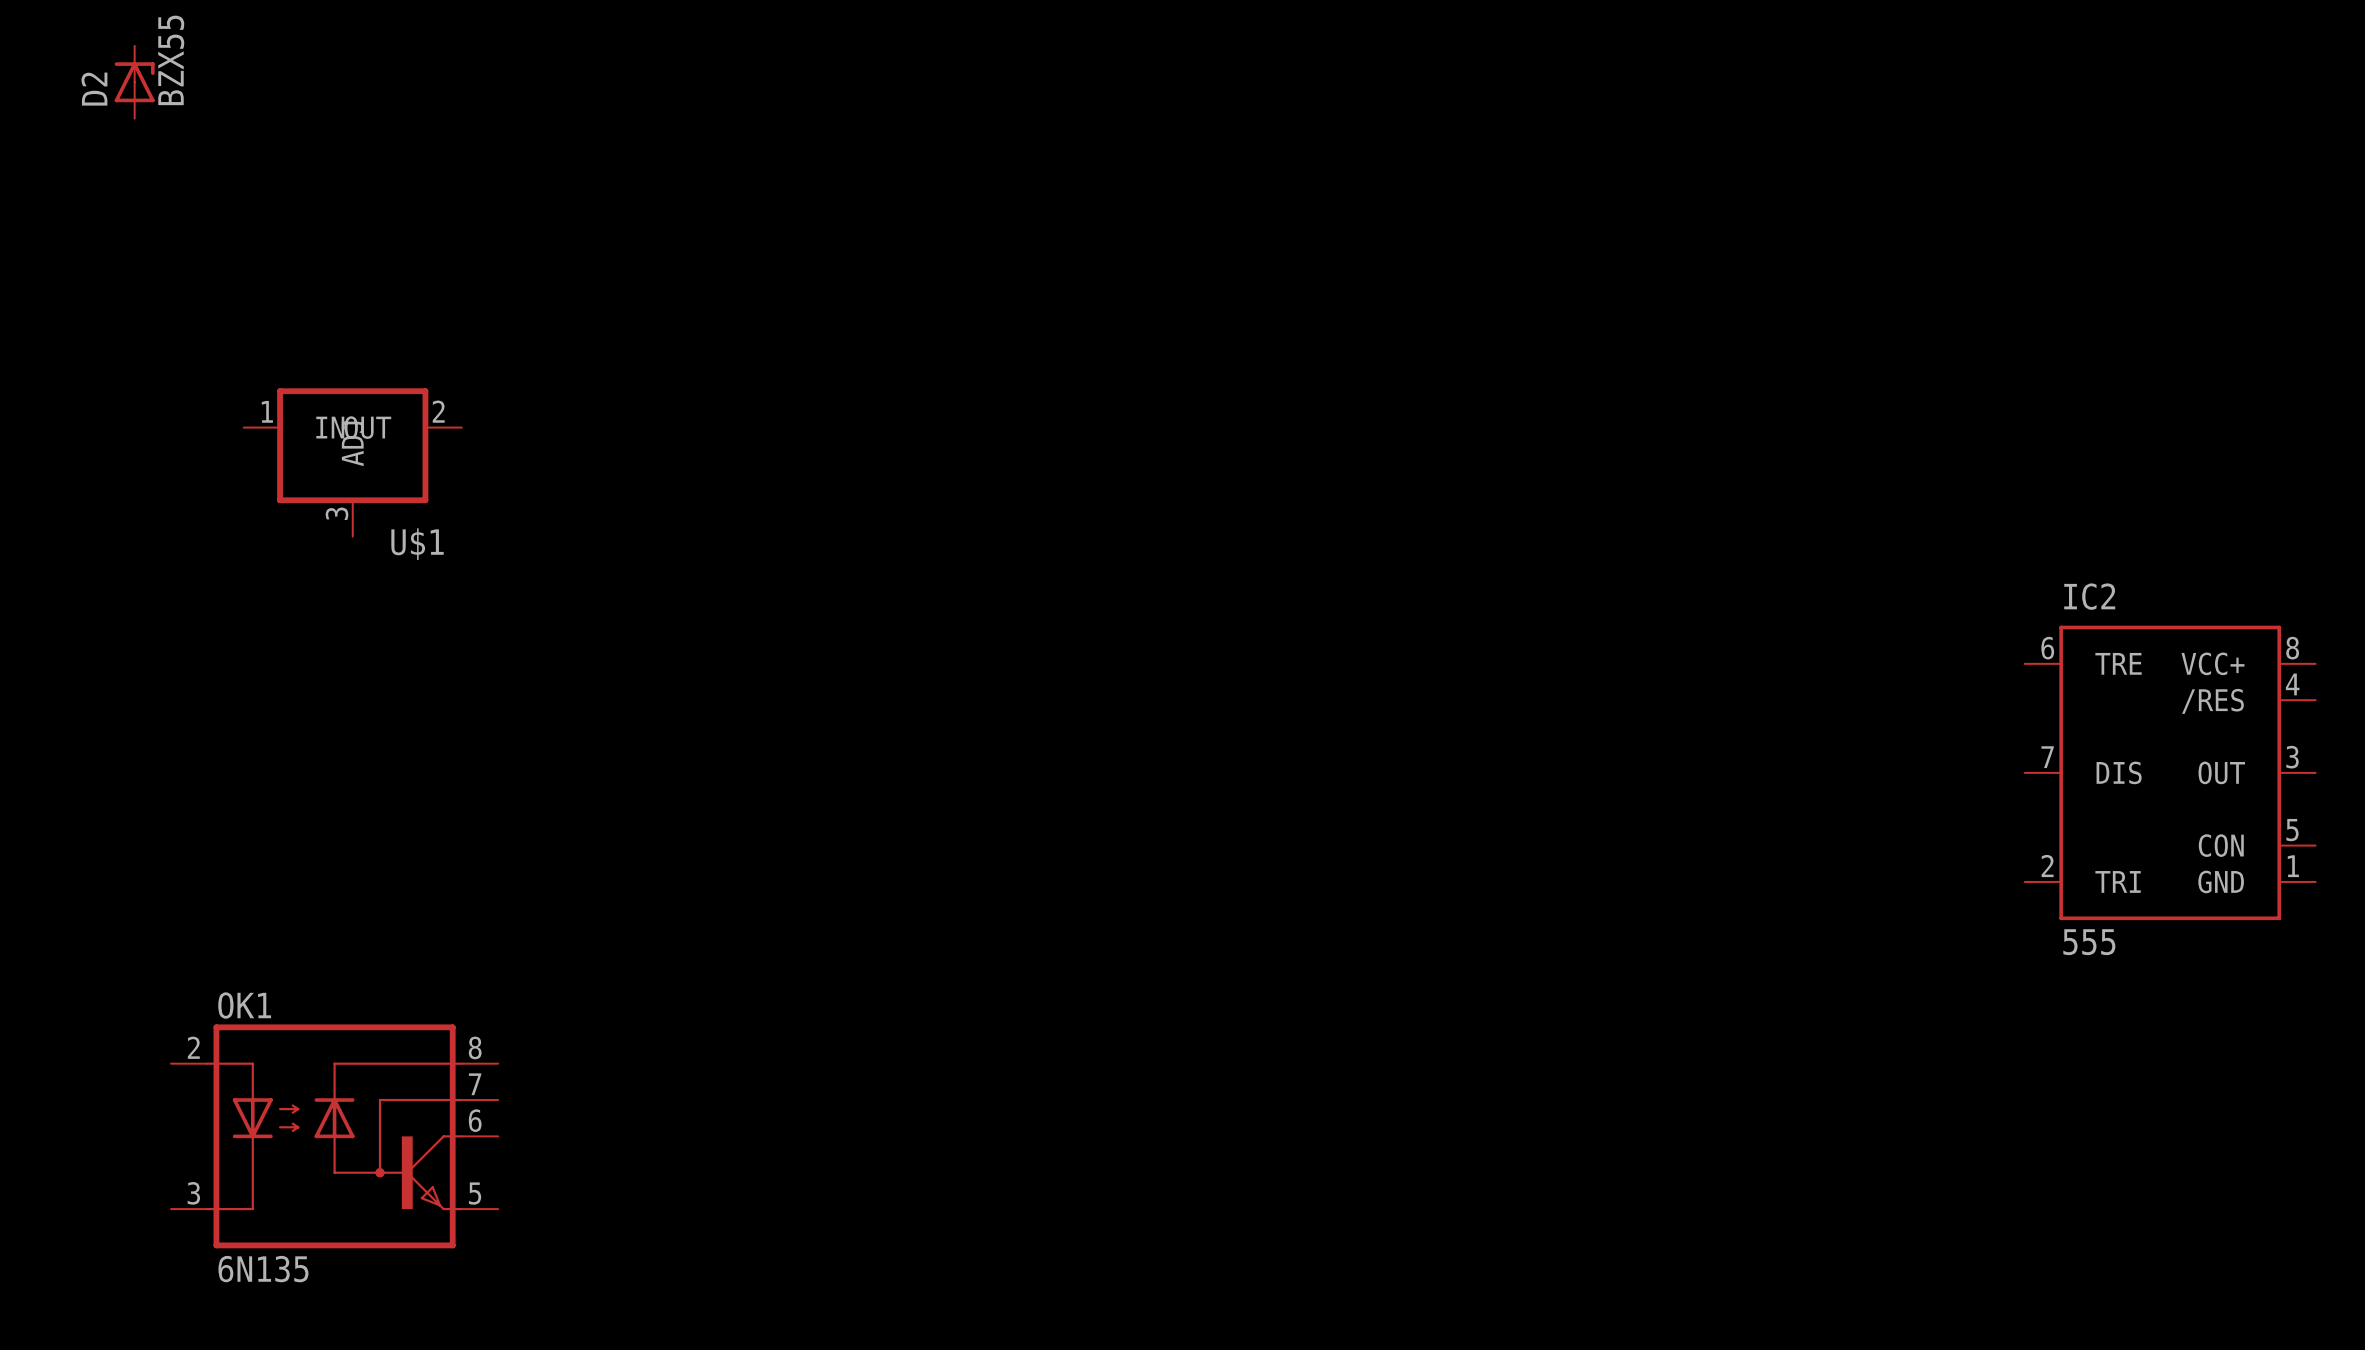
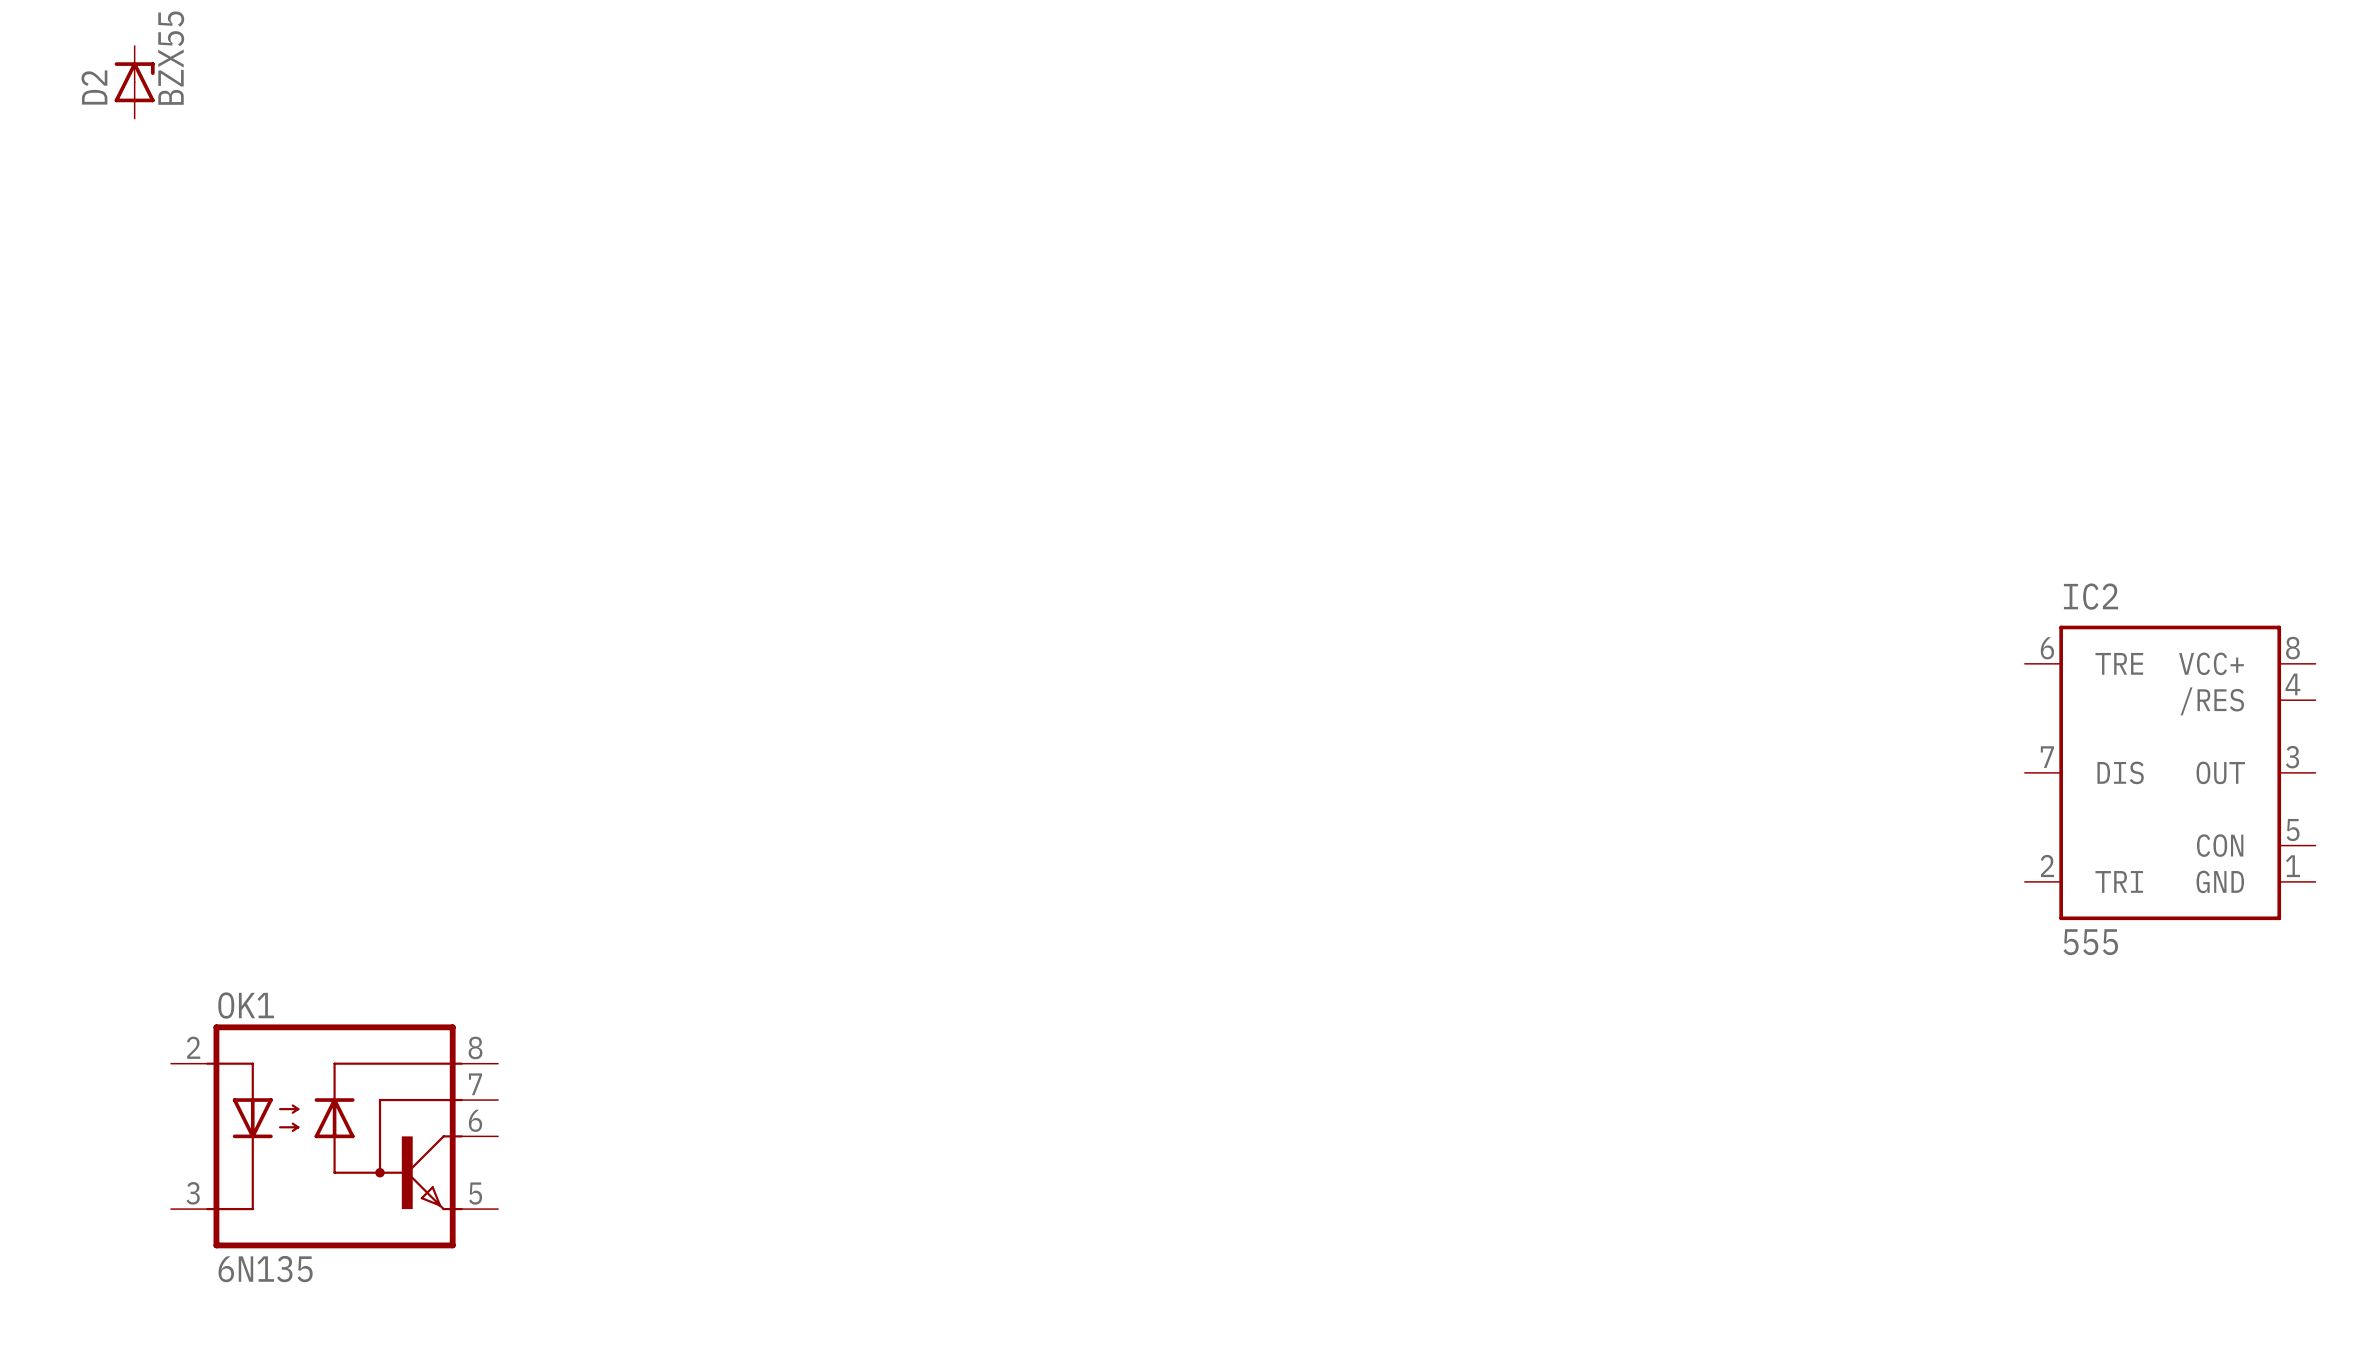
U$1: (352, 462) -> none

